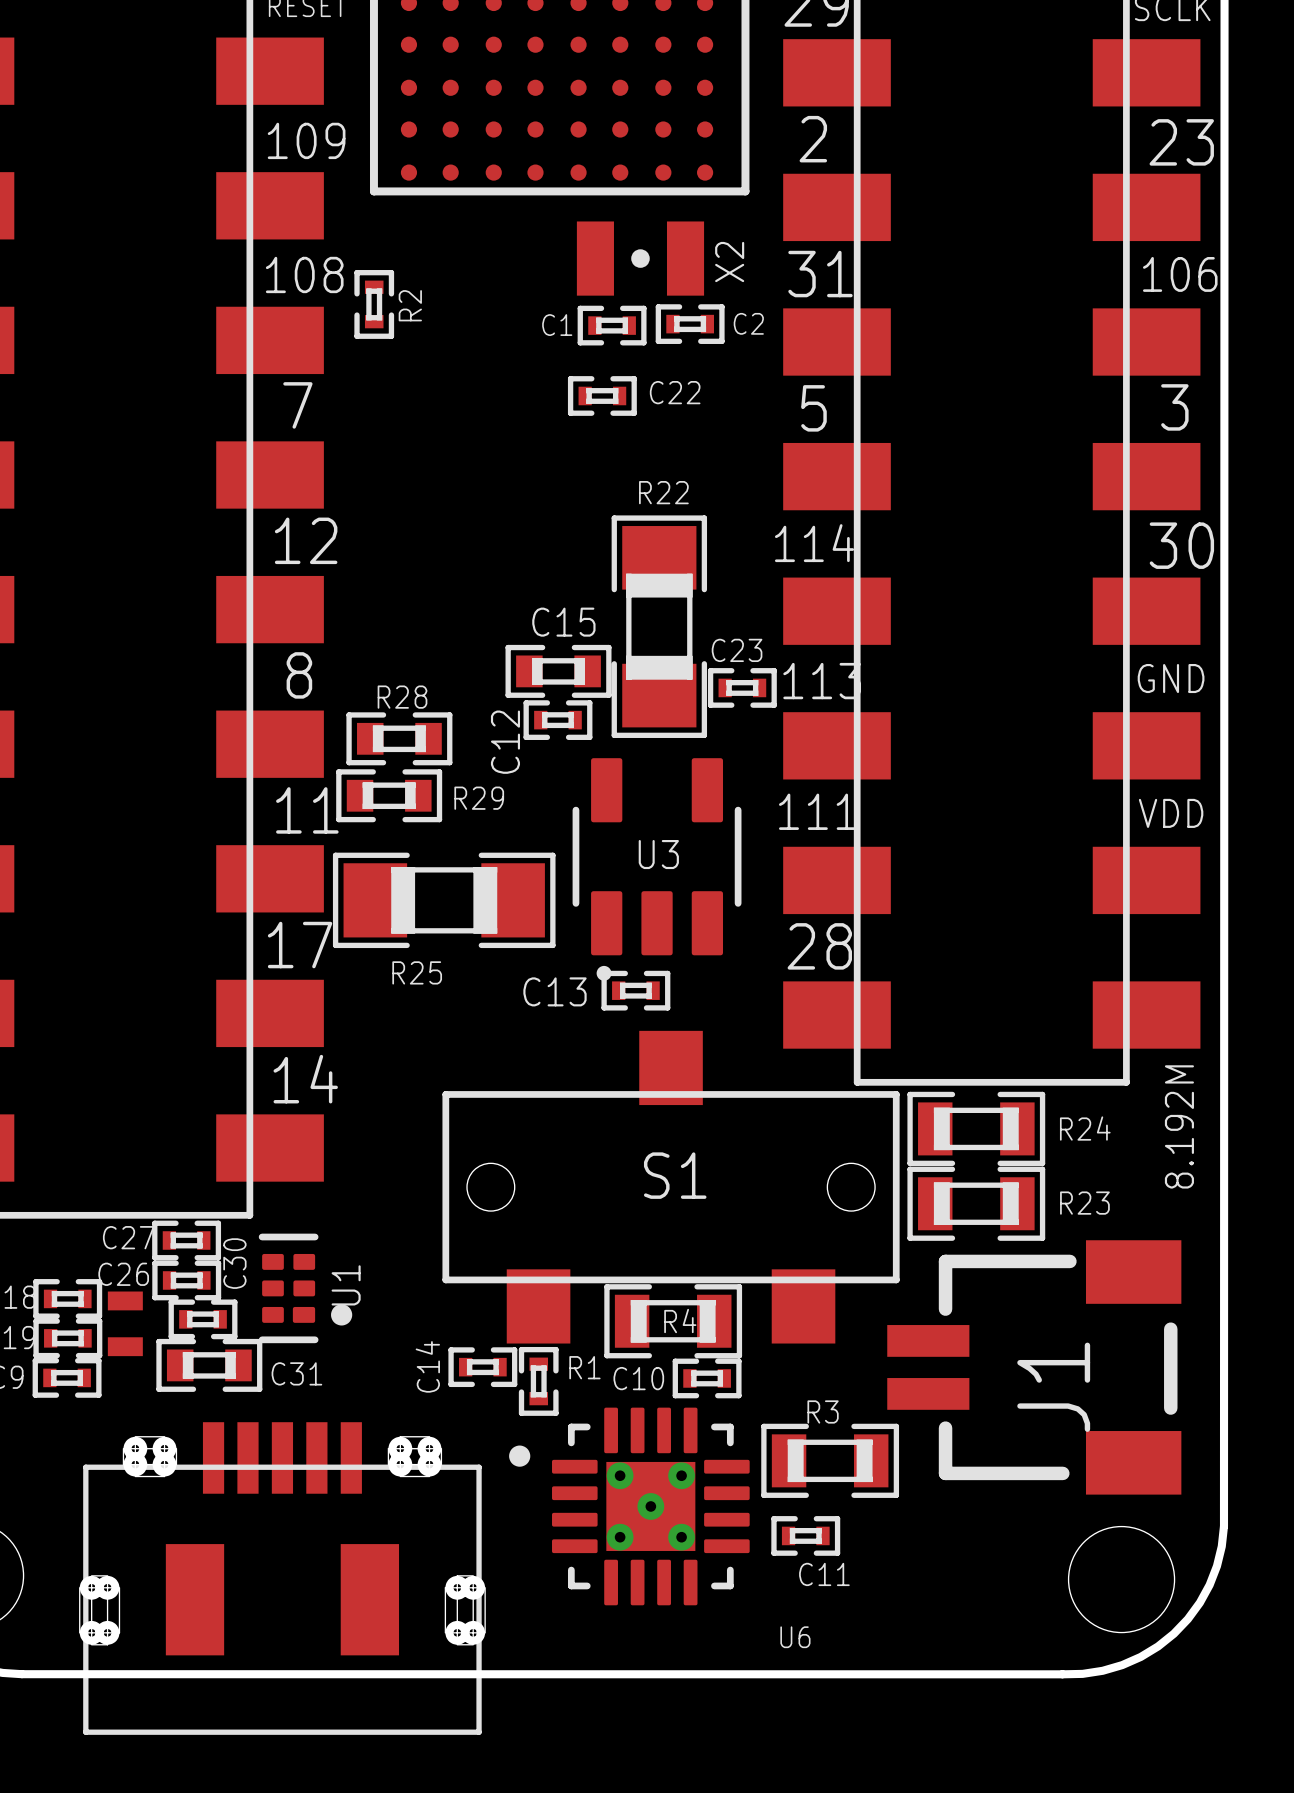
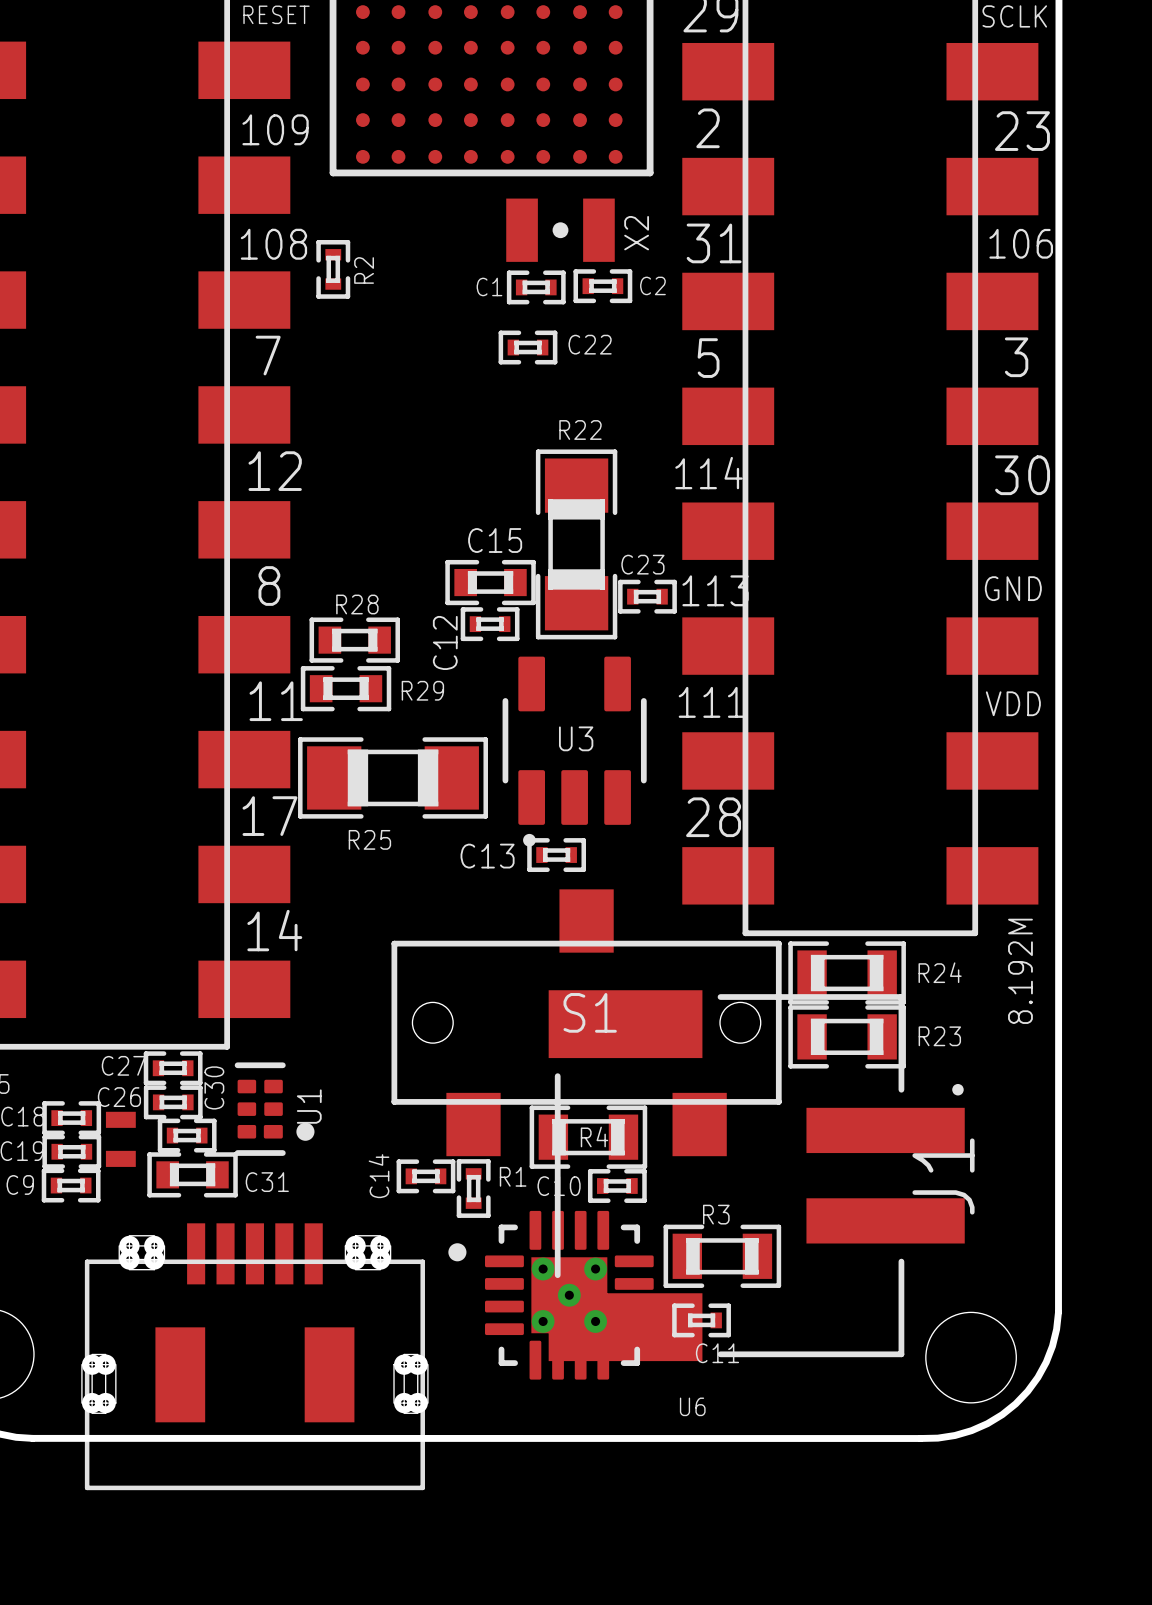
J1 footprint: [887, 1240, 1182, 1495] -> [548, 990, 965, 1362]
J1 name position: J1 (1053, 1387) -> J1 (943, 1176)

